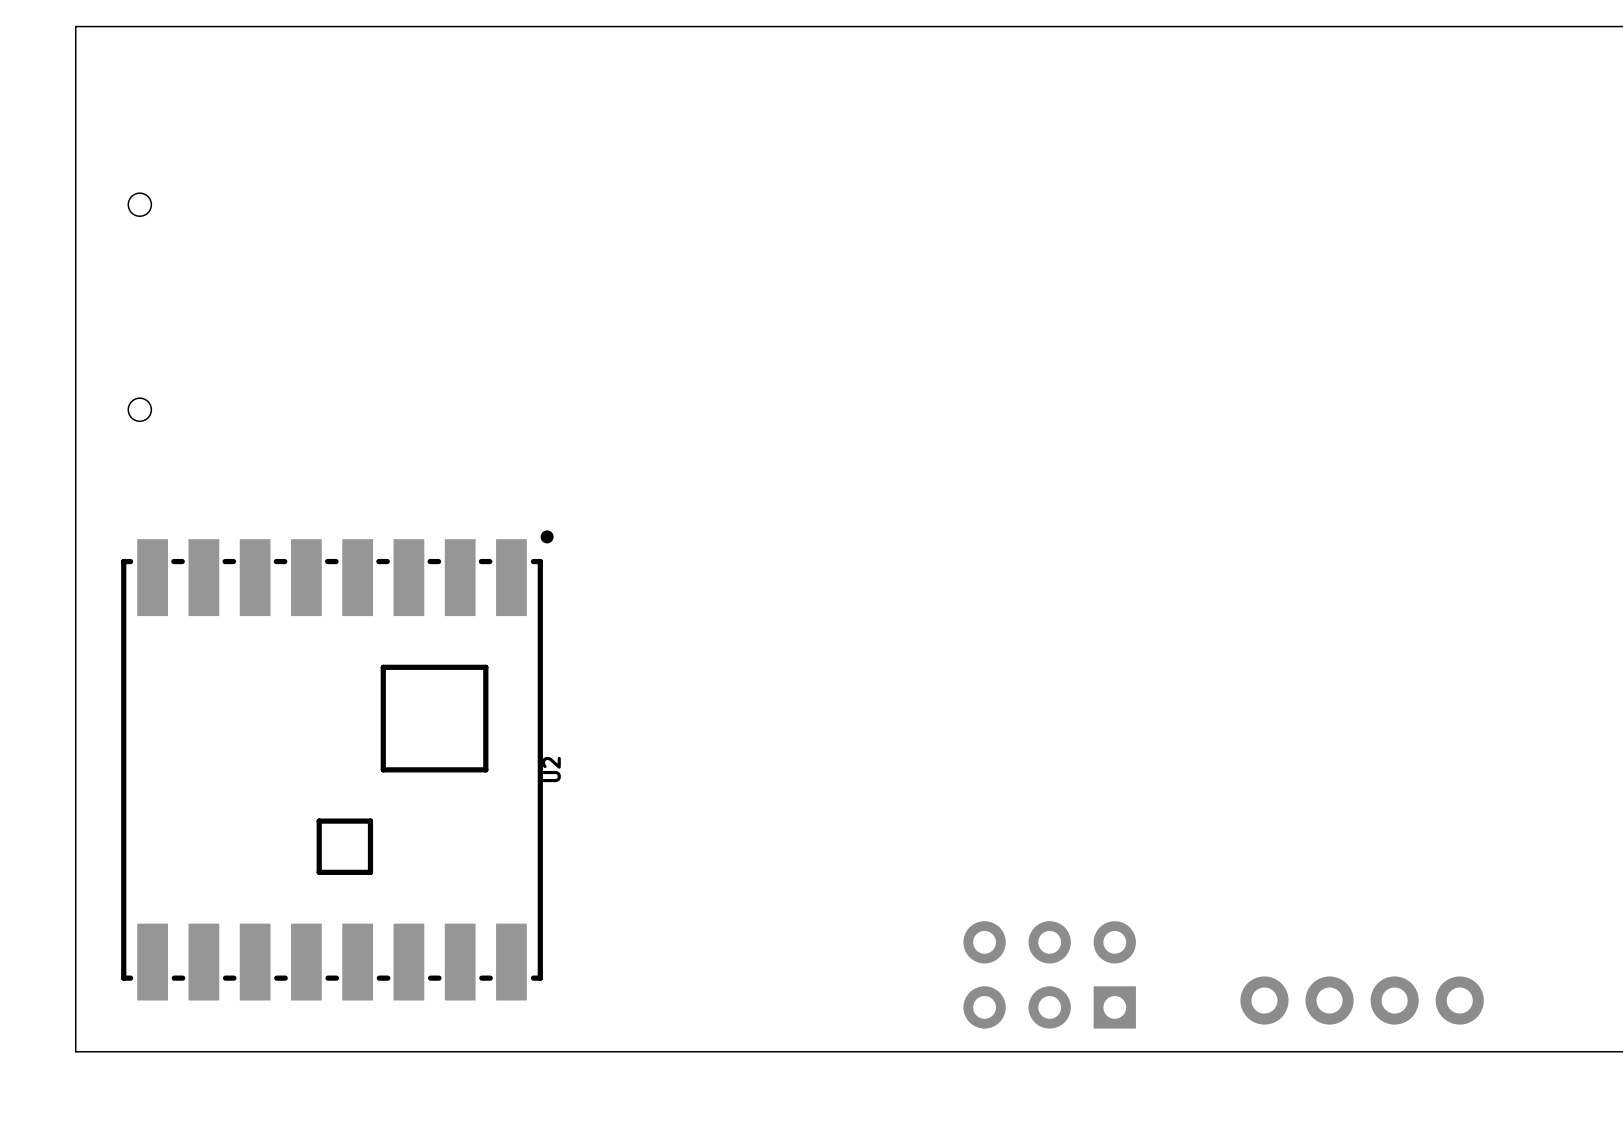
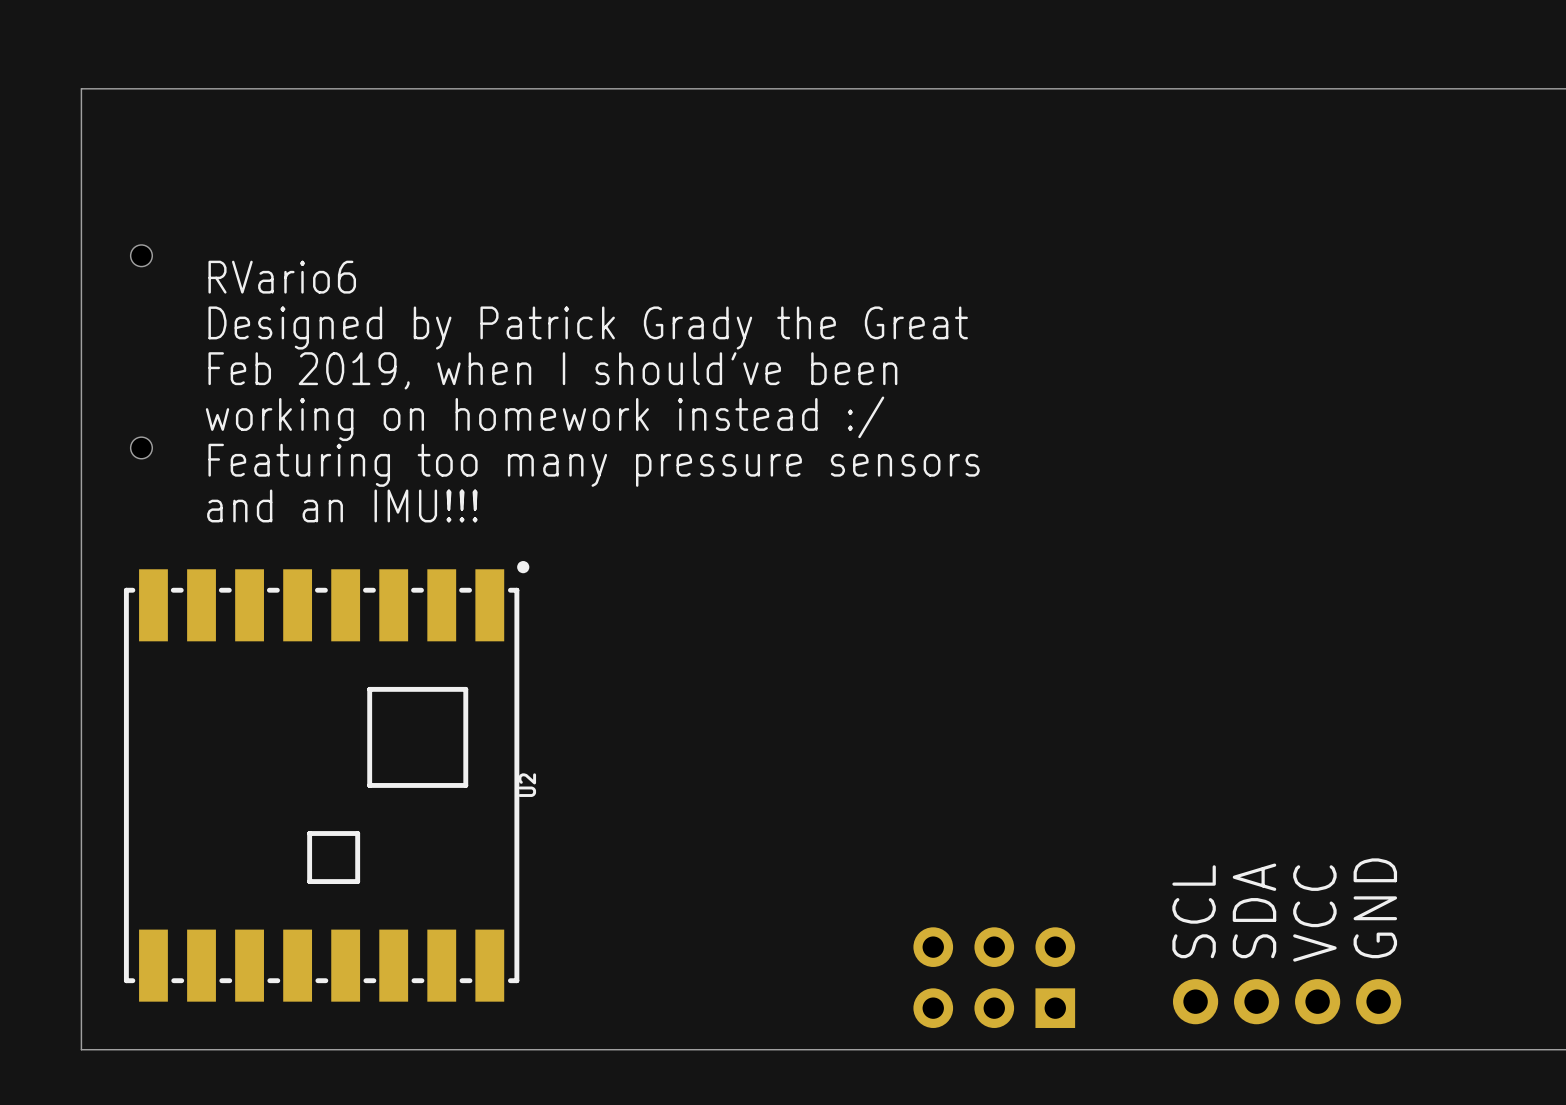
text: none -> RVario6 (282, 277)
text: none -> Designed by Patrick Grady the Great (588, 327)
text: none -> Feb 2019, when I should've been (552, 370)
text: none -> working on homework instead :/ (545, 418)
text: none -> Featuring too many pressure sensors (594, 465)
text: none -> and an IMU!!! (342, 505)
text: none -> GND (1375, 908)
text: none -> SDA (1254, 910)
text: none -> SCL (1194, 911)
text: none -> VCC (1314, 913)

